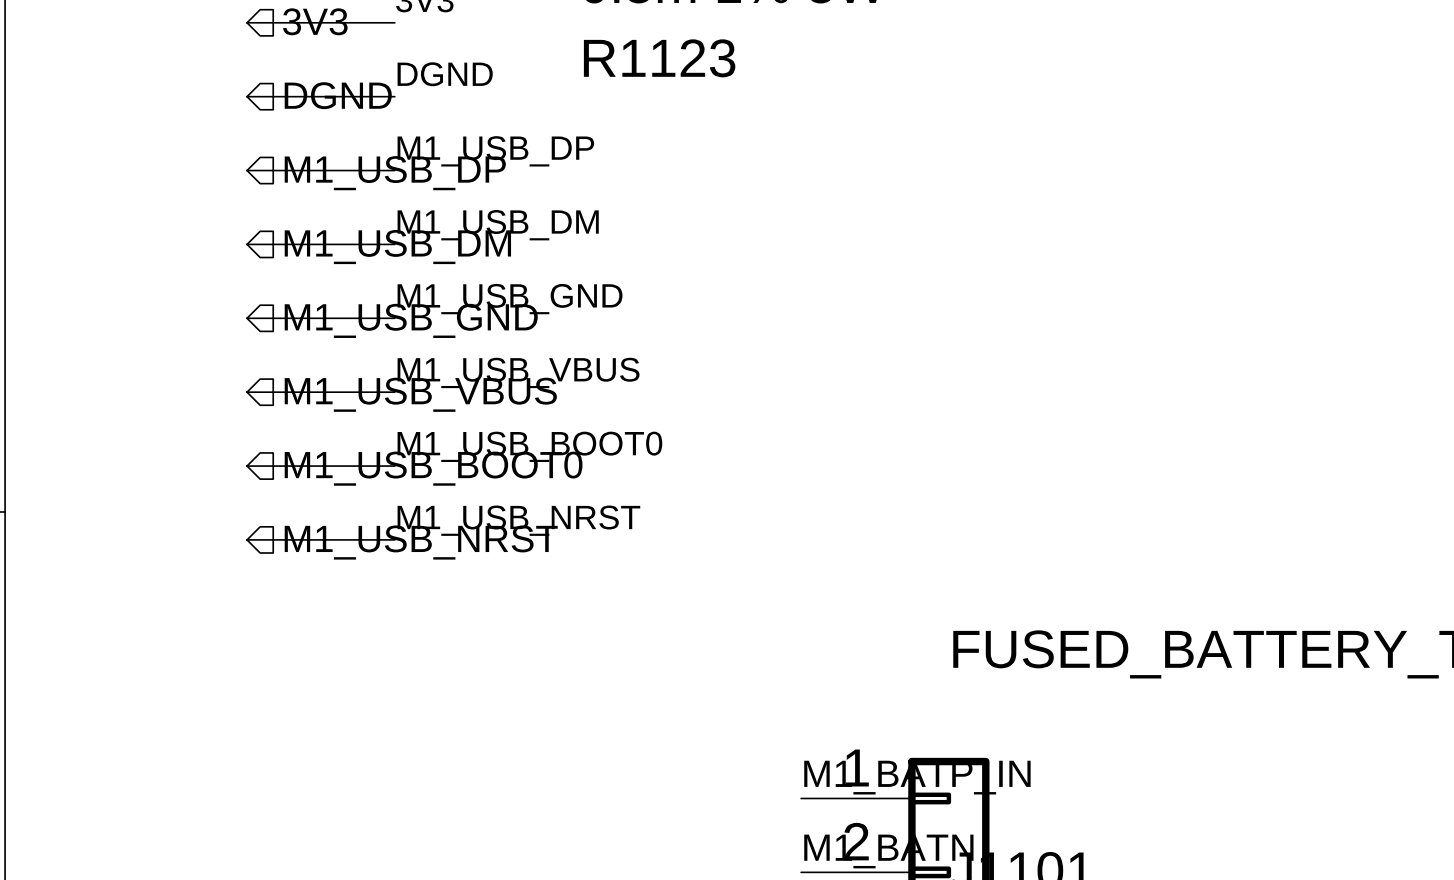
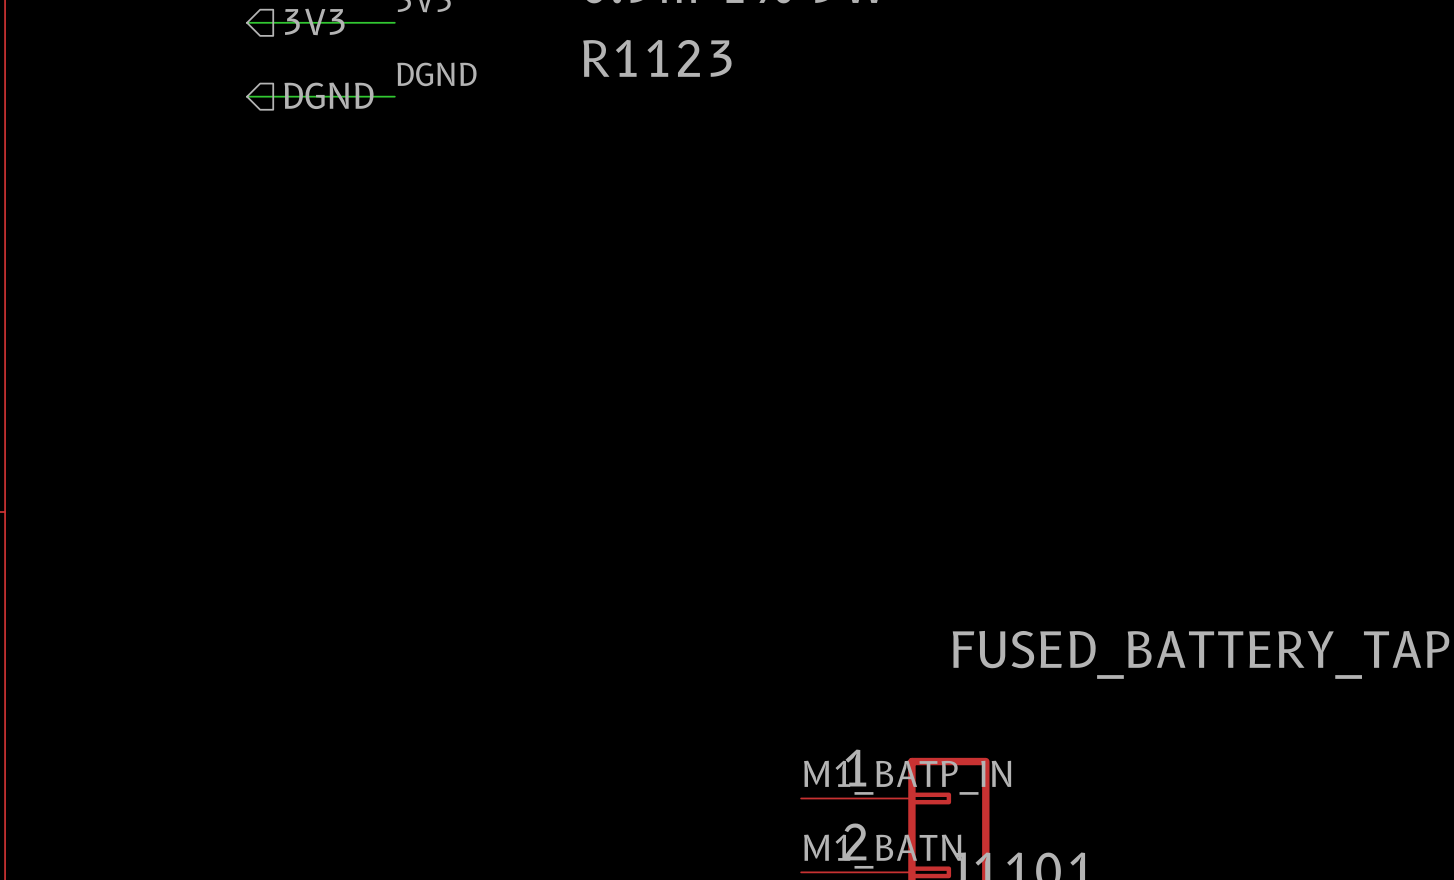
label: M1_USB_DP (495, 151) -> none
wire: (247, 170) (394, 170) -> none
hierarchical label: M1_USB_DP (395, 173) -> none
label: M1_USB_DM (498, 225) -> none
wire: (247, 244) (394, 244) -> none
hierarchical label: M1_USB_DM (397, 247) -> none
label: M1_USB_GND (510, 299) -> none
wire: (247, 318) (394, 318) -> none
hierarchical label: M1_USB_GND (411, 320) -> none
label: M1_USB_VBUS (518, 372) -> none
wire: (247, 392) (394, 392) -> none
hierarchical label: M1_USB_VBUS (420, 394) -> none
label: M1_USB_BOOT0 (529, 446) -> none
wire: (247, 466) (394, 466) -> none
hierarchical label: M1_USB_BOOT0 (433, 468) -> none
label: M1_USB_NRST (518, 520) -> none
wire: (247, 539) (394, 539) -> none
hierarchical label: M1_USB_NRST (421, 542) -> none

